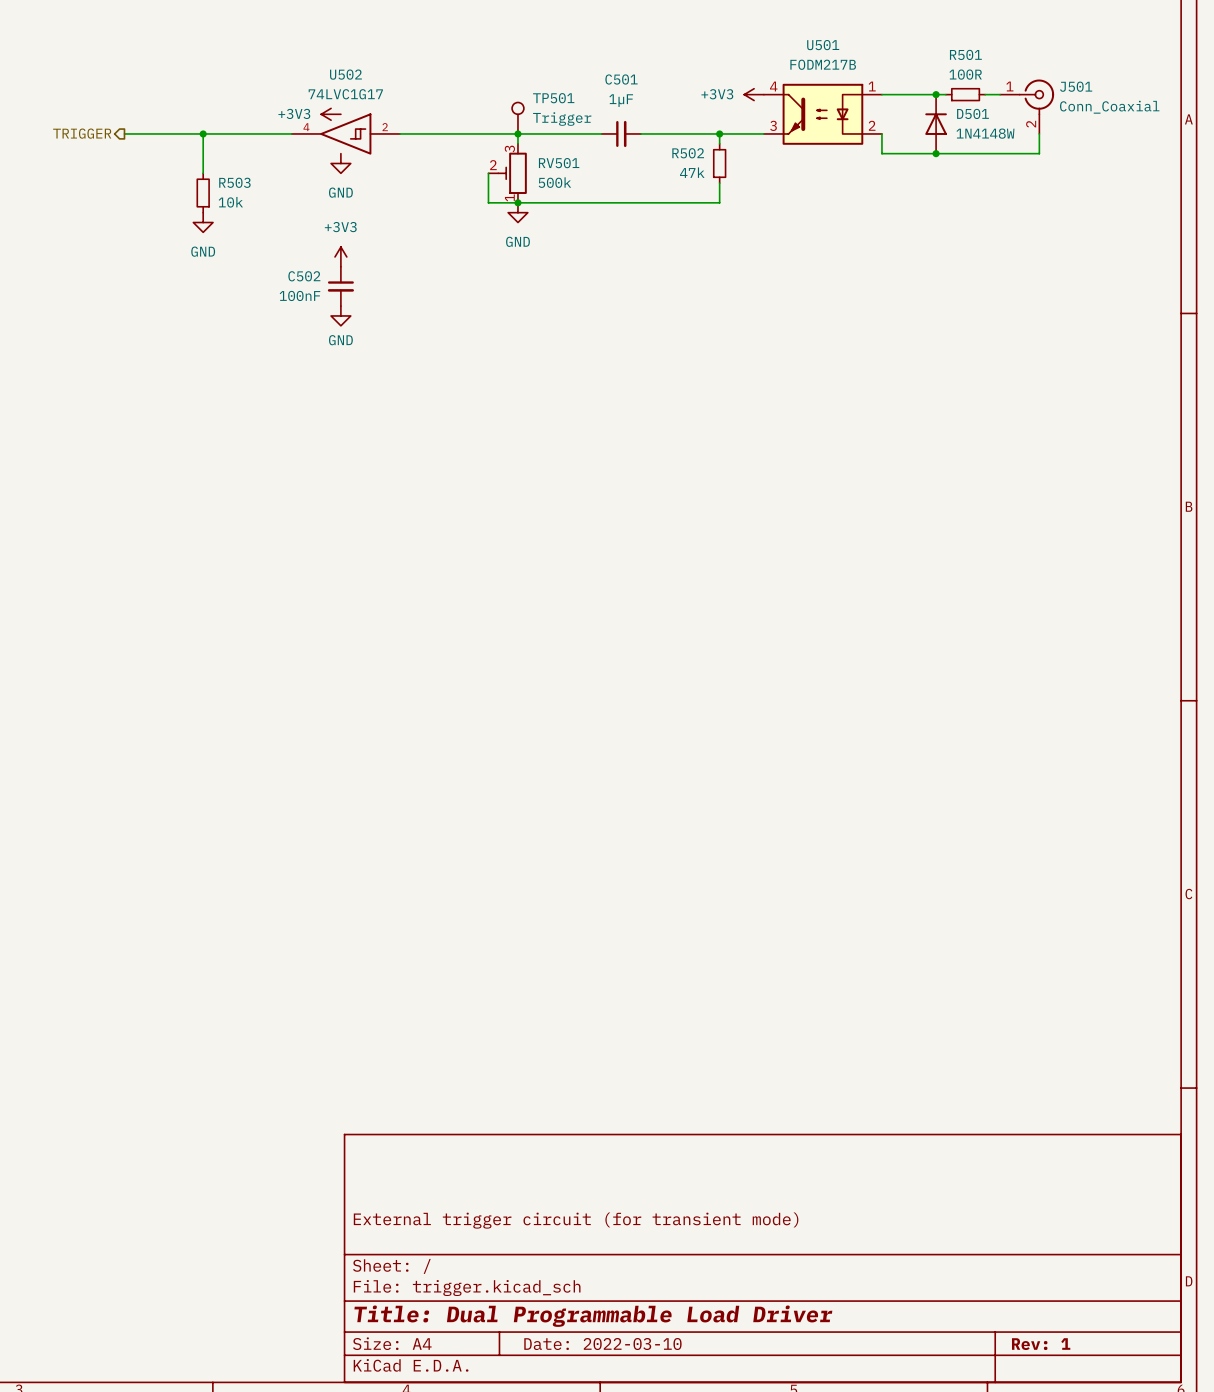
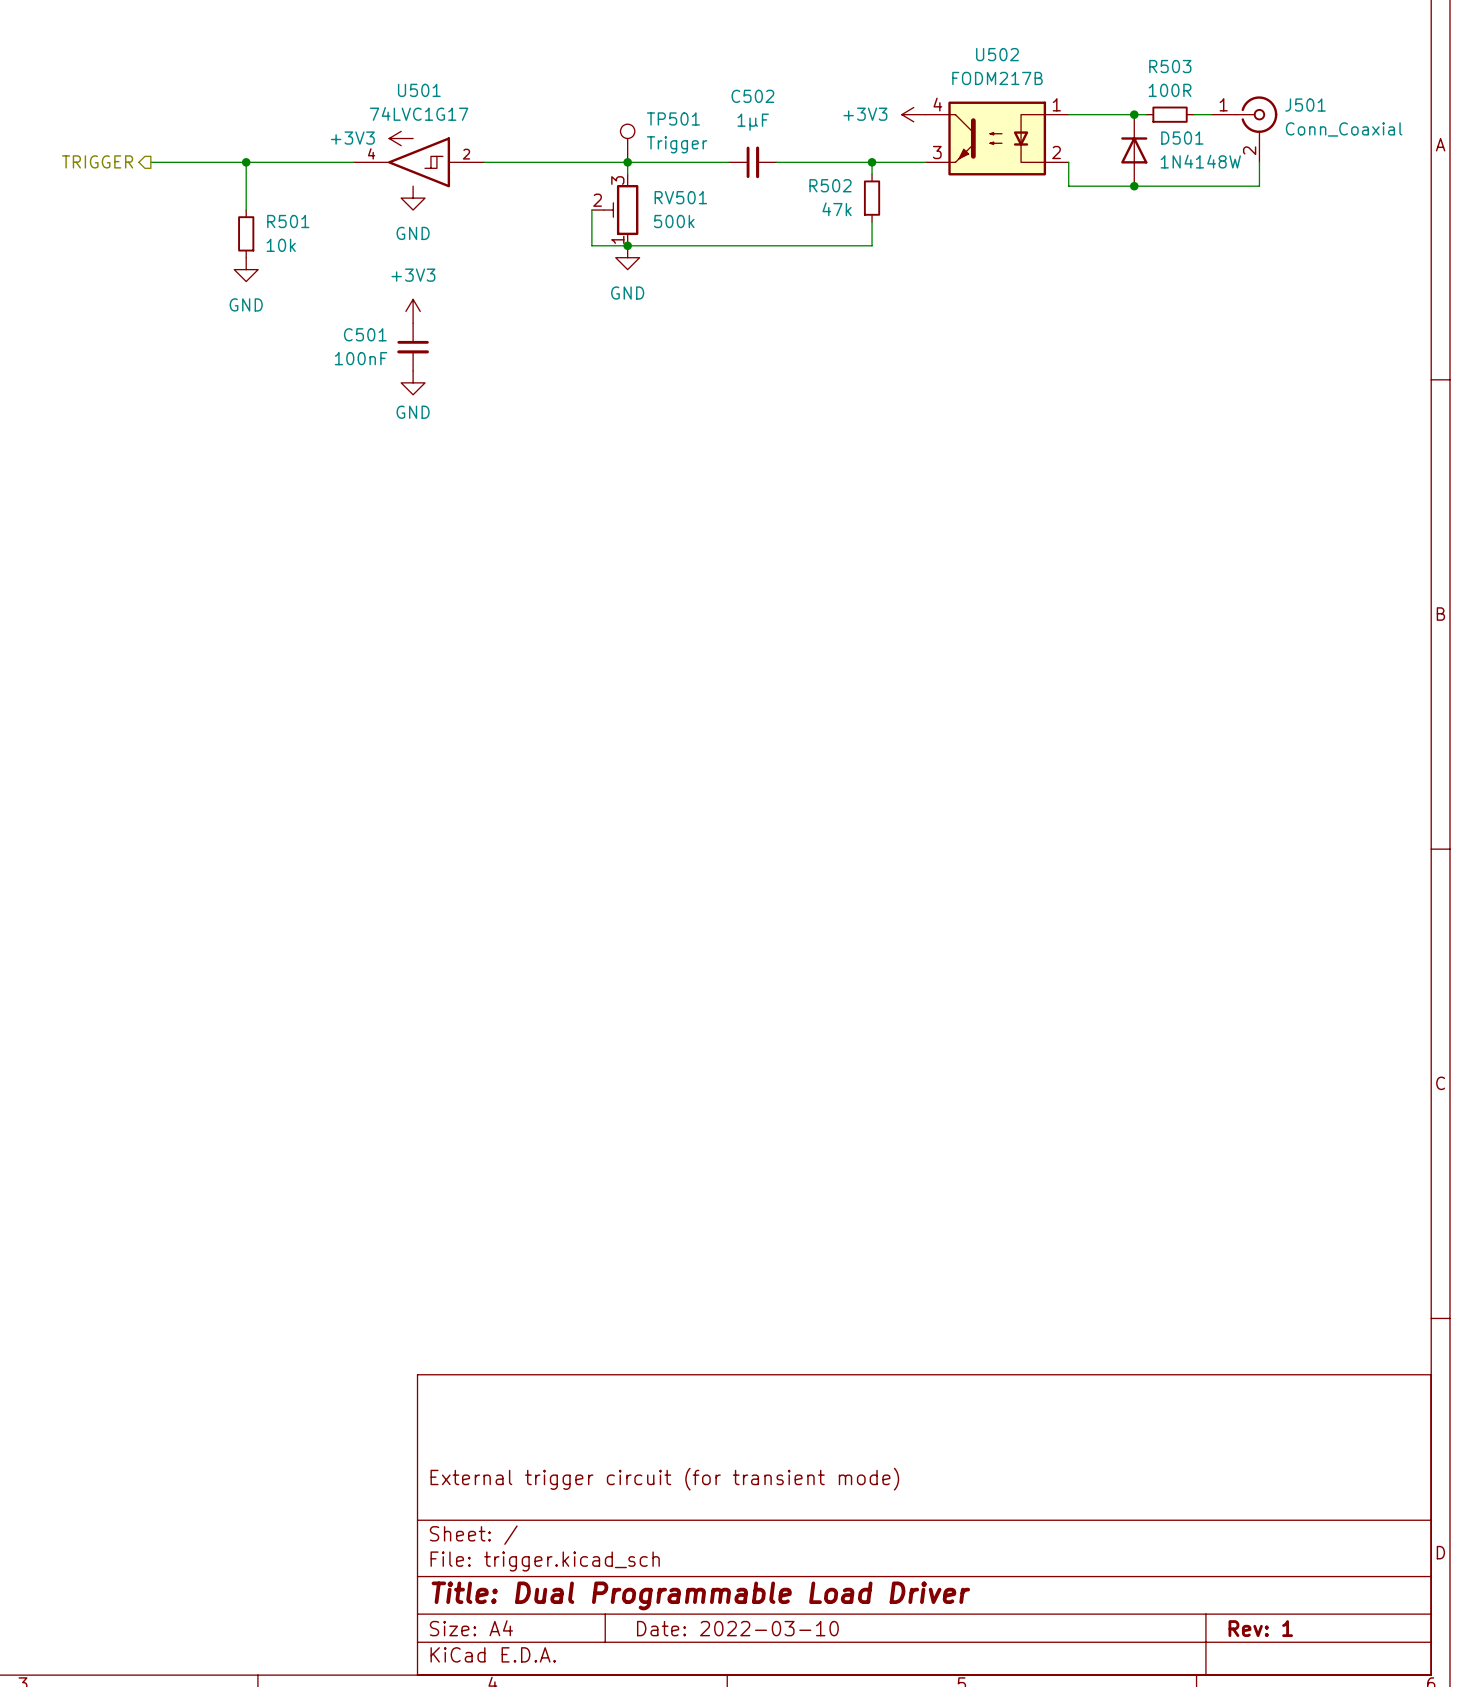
U501 name: U501 (823, 45) -> U502 (997, 54)
R501 name: R501 (965, 54) -> R503 (1170, 66)
U502 name: U502 (345, 74) -> U501 (419, 90)
C501 name: C501 (621, 79) -> C502 (752, 96)
R503 name: R503 (234, 182) -> R501 (288, 221)
C502 name: C502 (304, 276) -> C501 (365, 334)

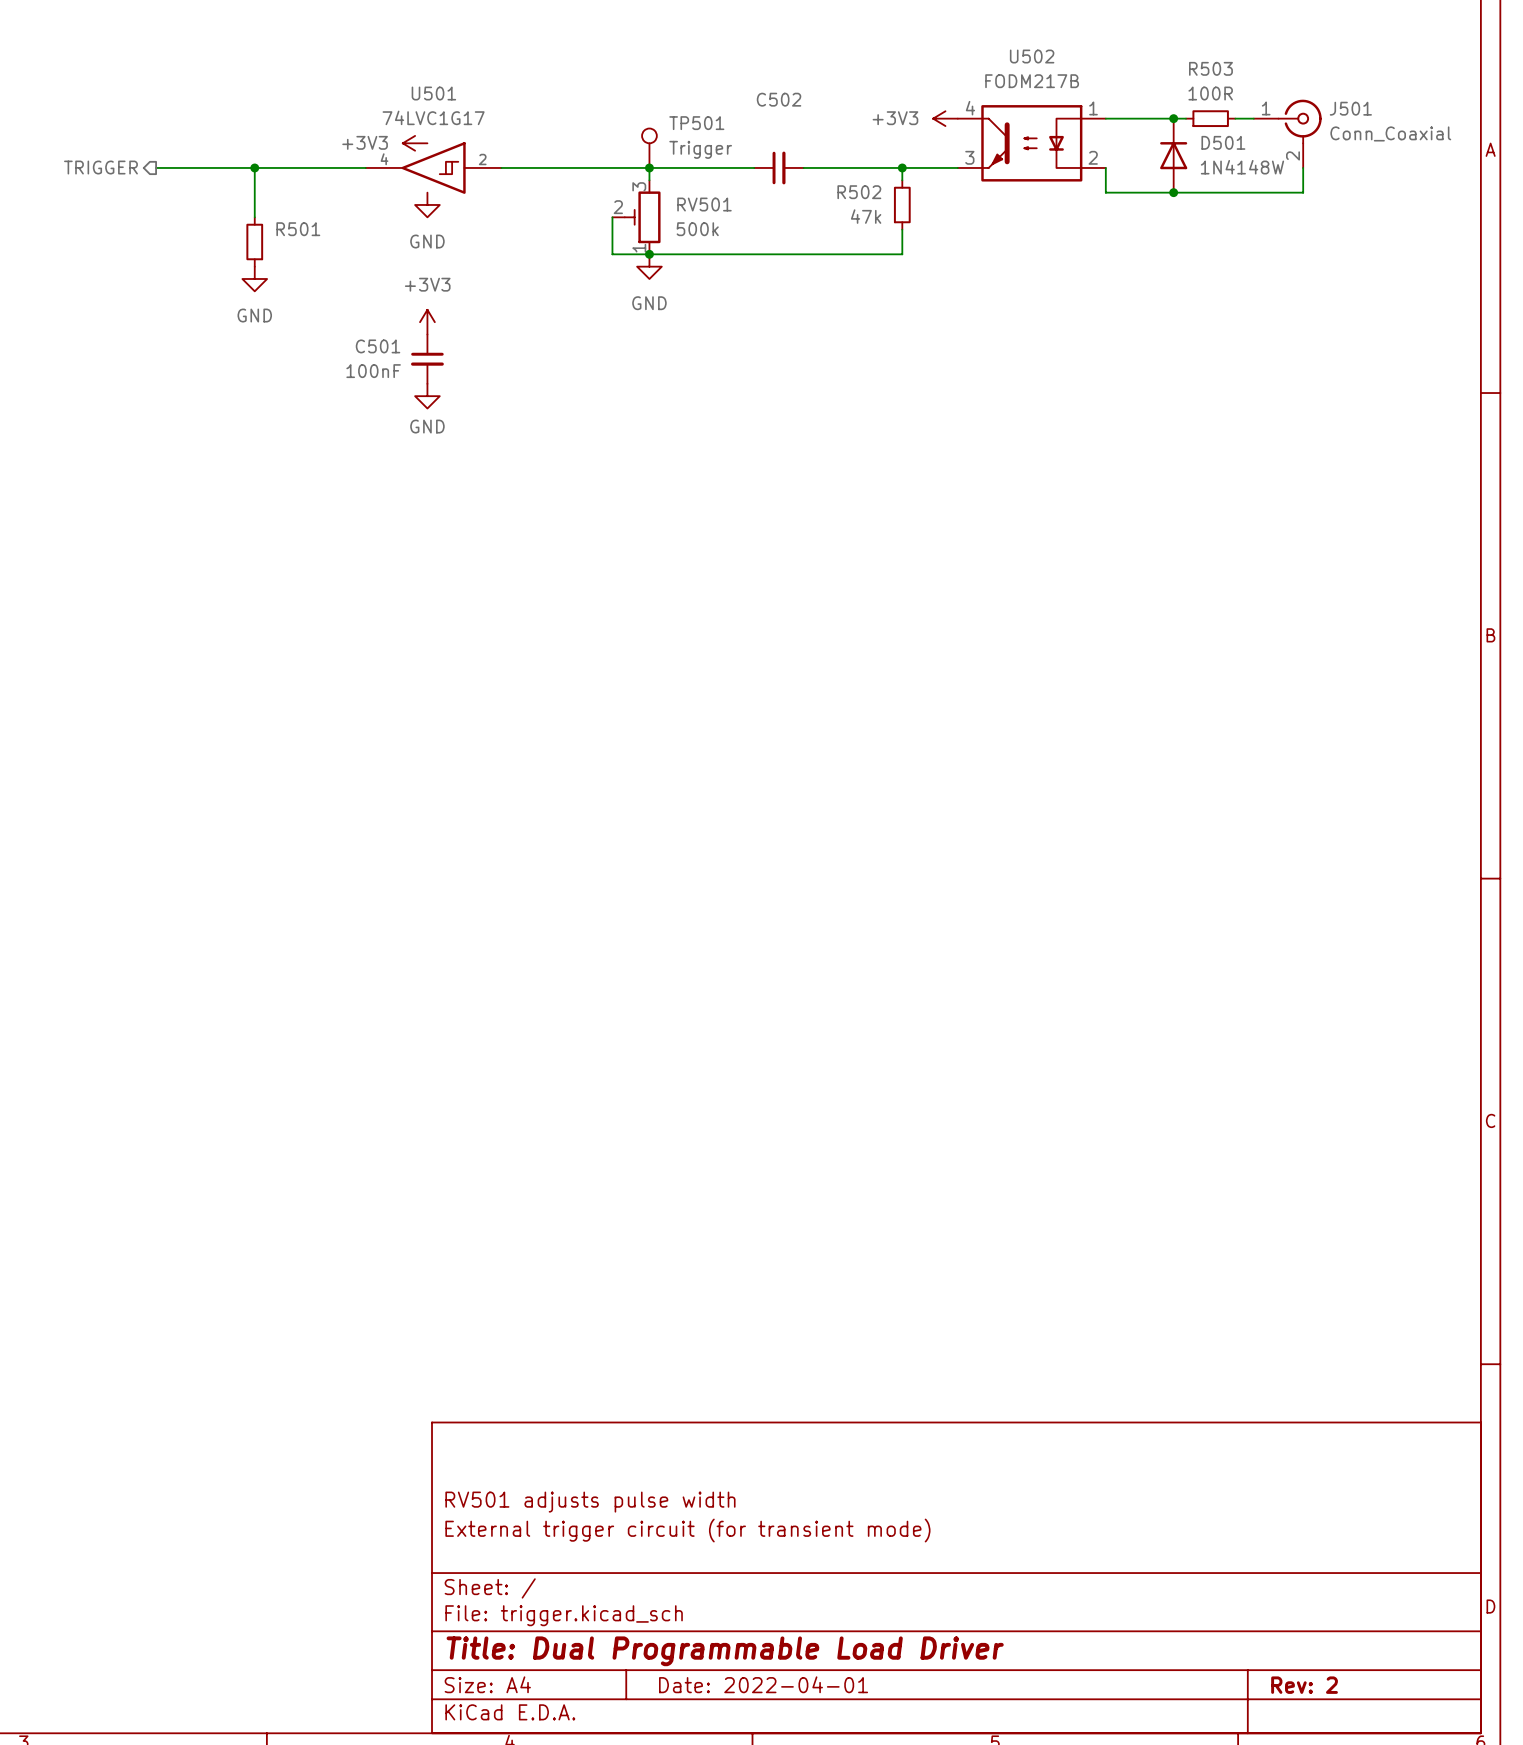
C502 value: 1µF (753, 122) -> none
R501 value: 10k (281, 245) -> none
title block: none -> RV501 adjusts pulse width (590, 1502)
title block: Date: 2022-03-10 (737, 1628) -> Date: 2022-04-01 (763, 1684)
title block: Rev: 1 (1260, 1628) -> Rev: 2 (1304, 1685)

